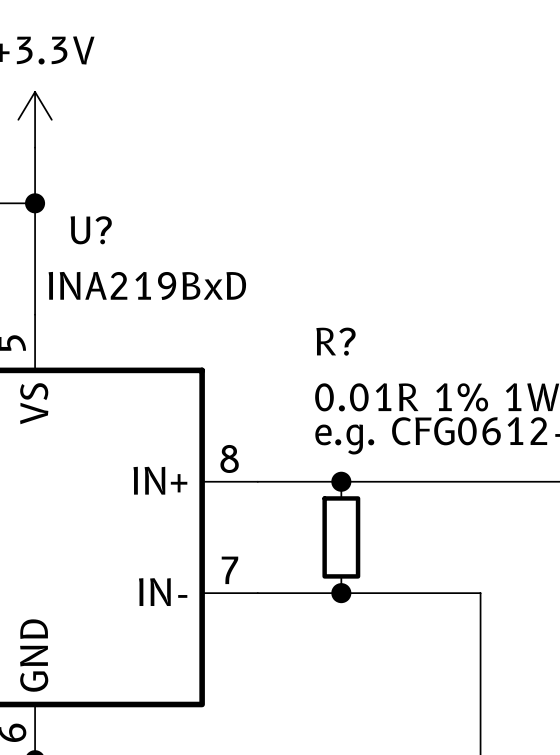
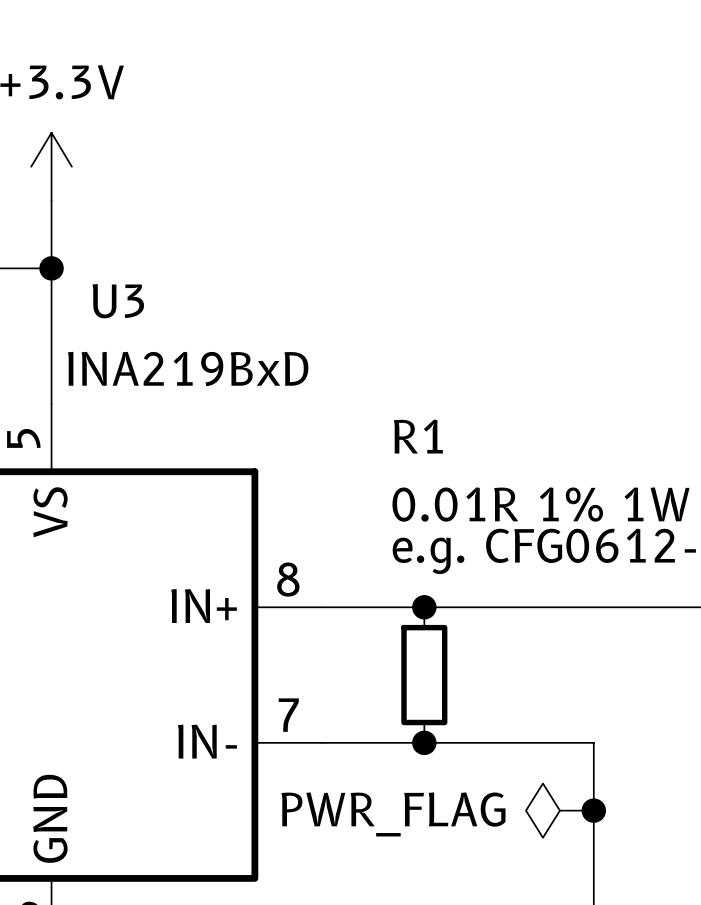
U? name: U? (91, 230) -> U3 (118, 301)
R? name: R? (335, 341) -> R1 (418, 436)
power symbol: none -> PWR_FLAG (559, 810)
junction: none -> (593, 810)

